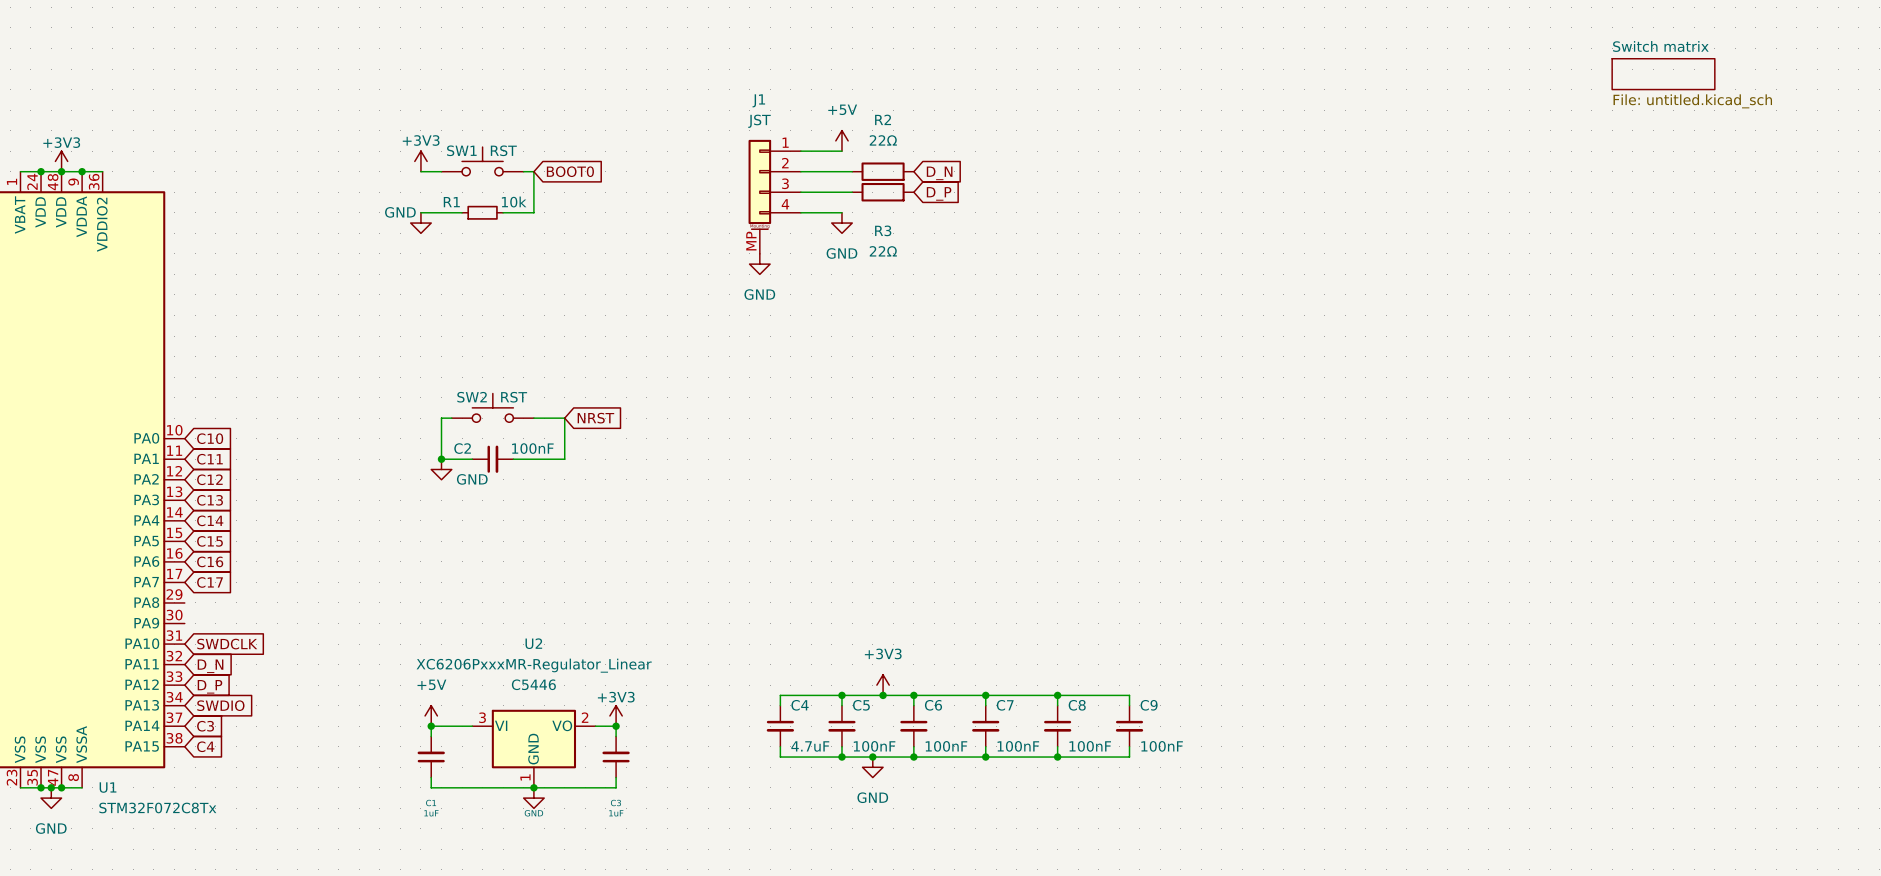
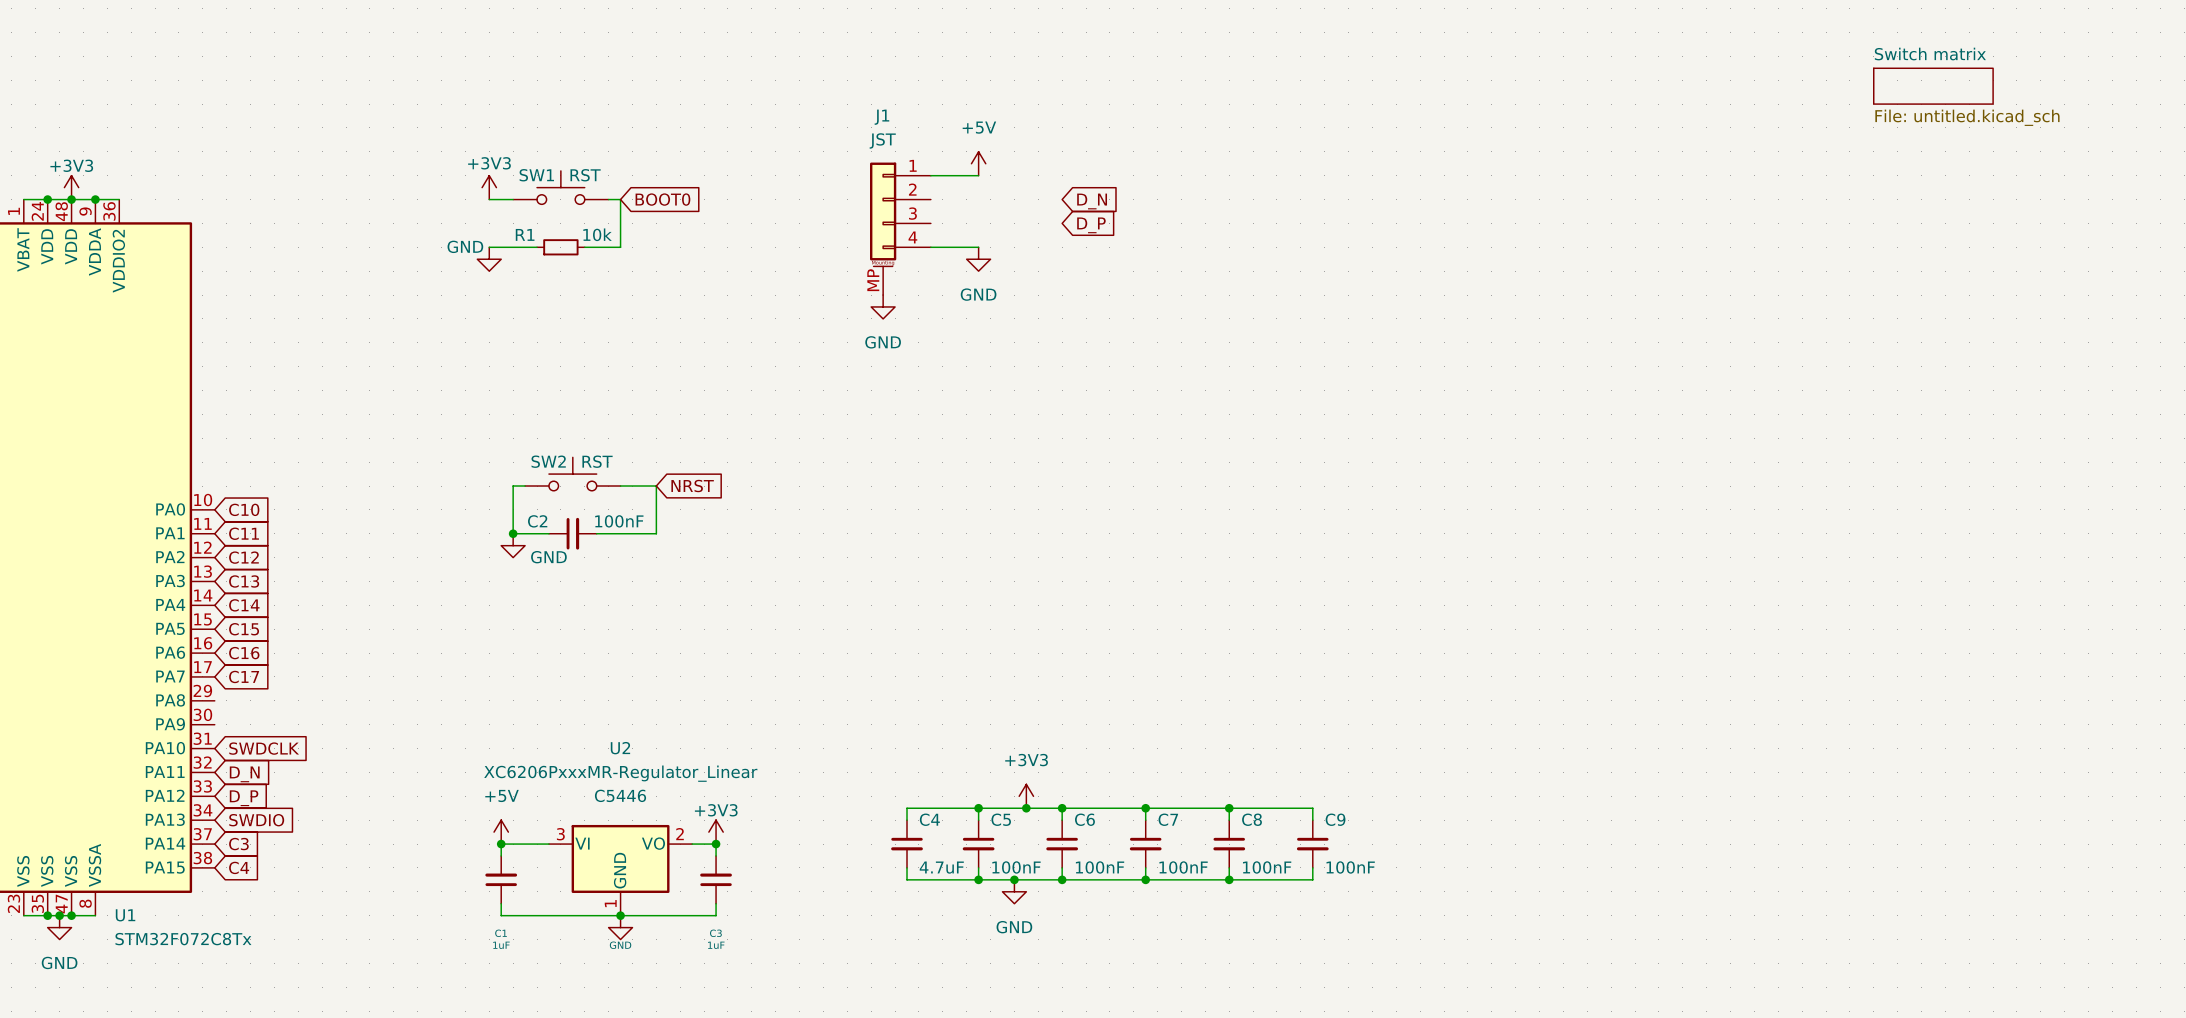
wire: (800, 171) (852, 171) -> none
R2: 22Ω (883, 171) -> none
wire: (800, 192) (852, 192) -> none
R3: 22Ω (883, 192) -> none

